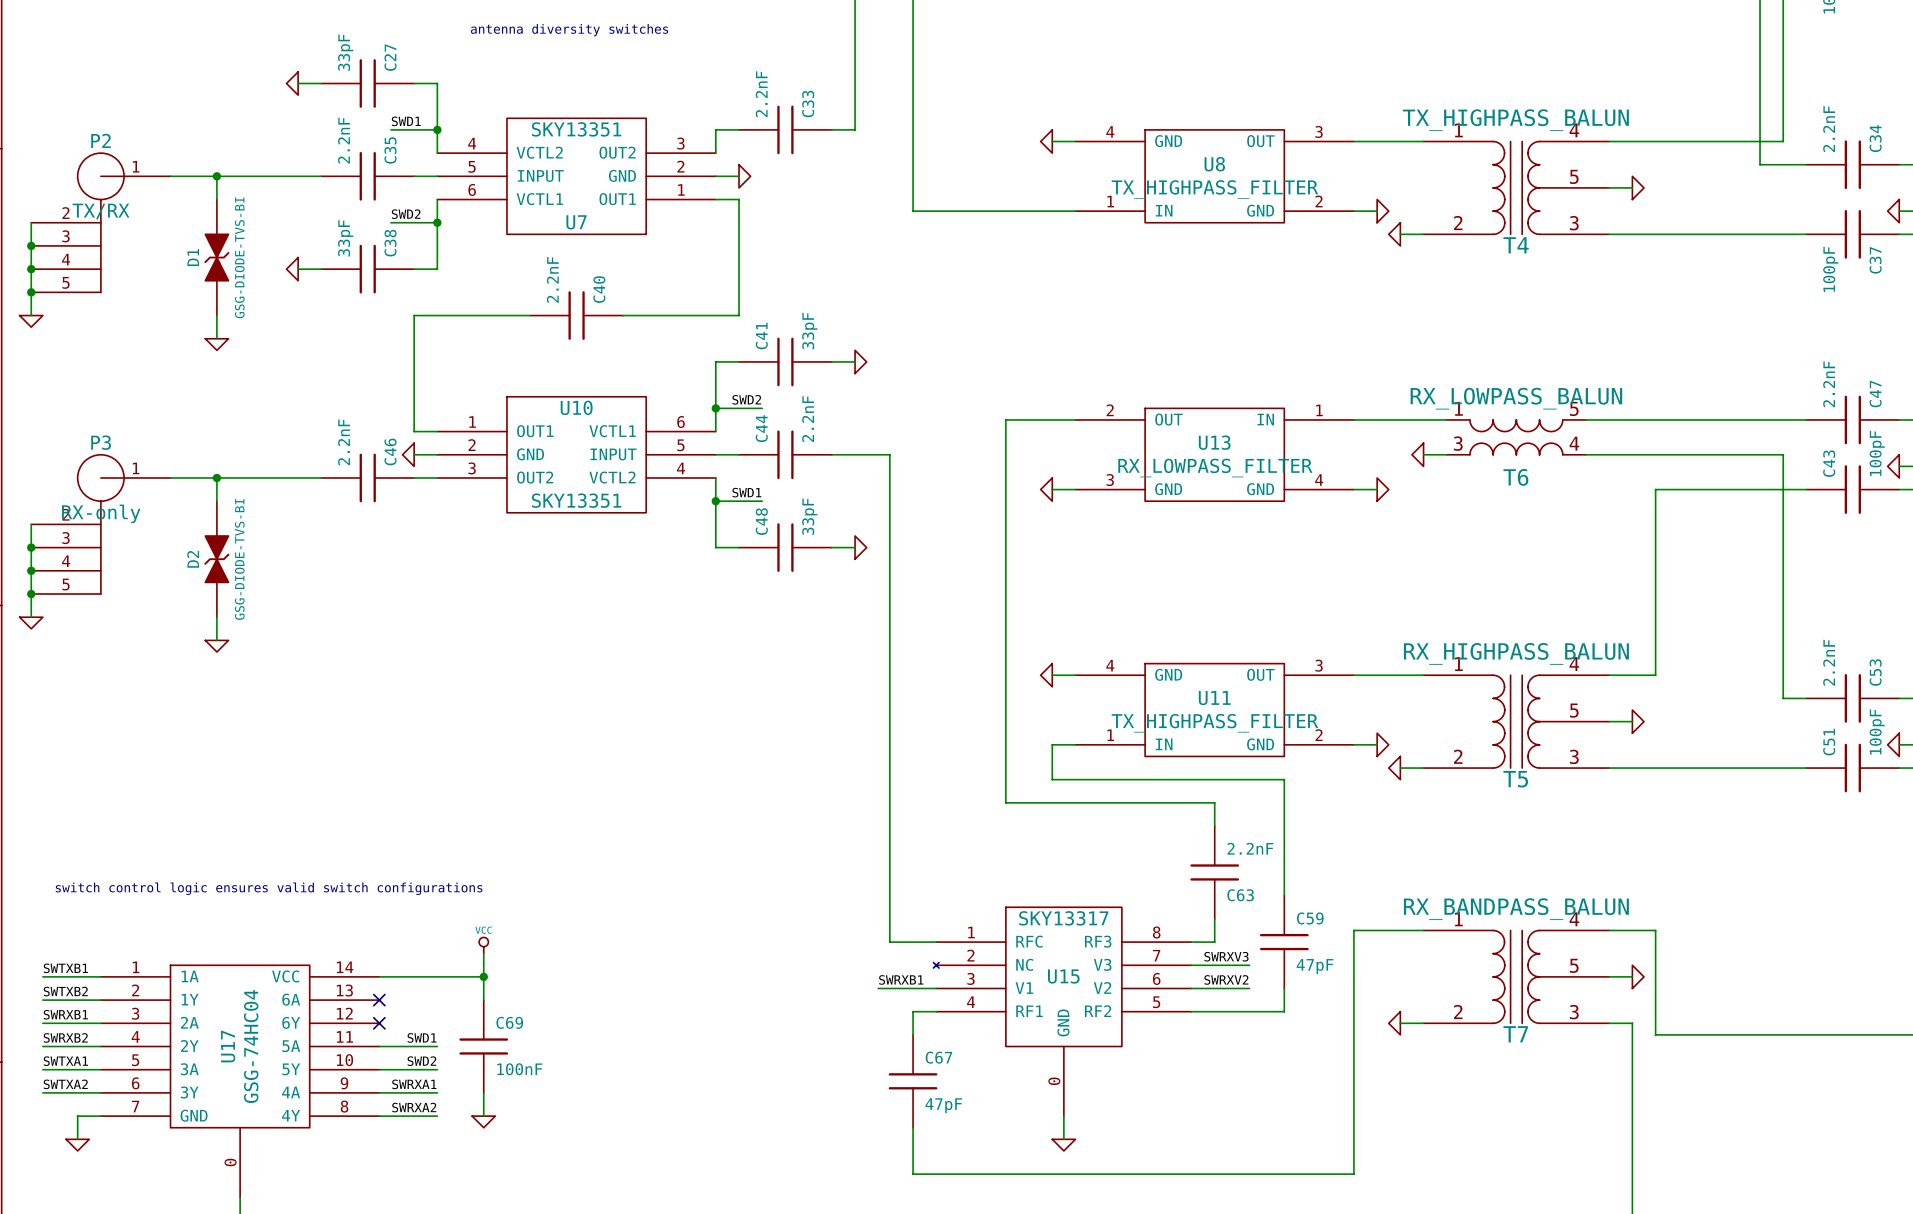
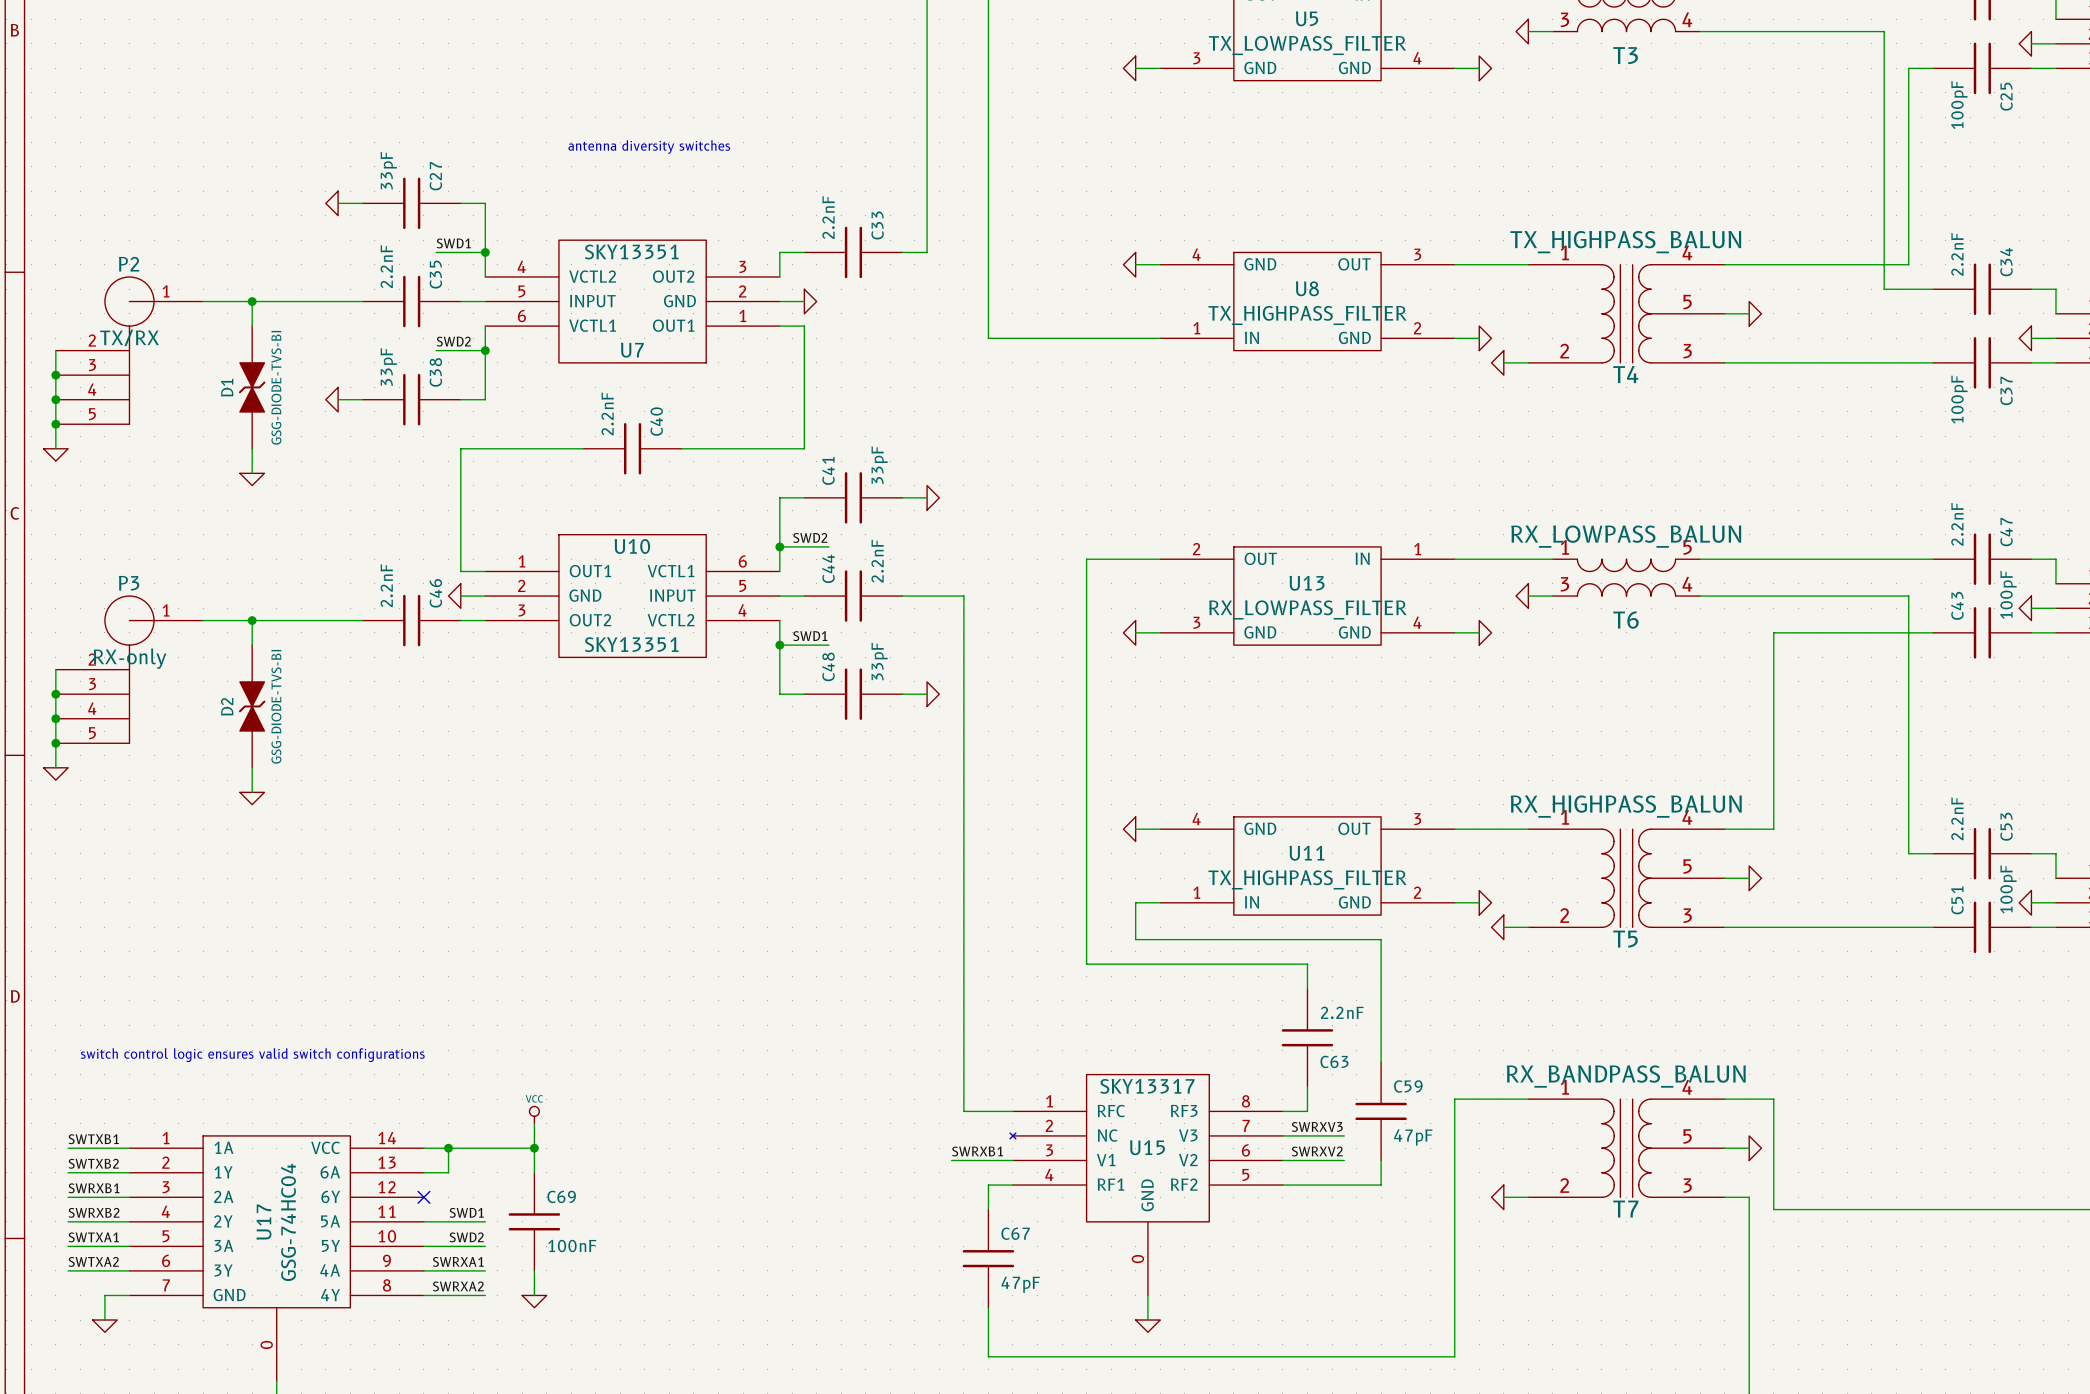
wire: none -> (448, 1148) (448, 1172) (423, 1172)
junction: none -> (448, 1148)
no-connect mark: (379, 1000) -> none

